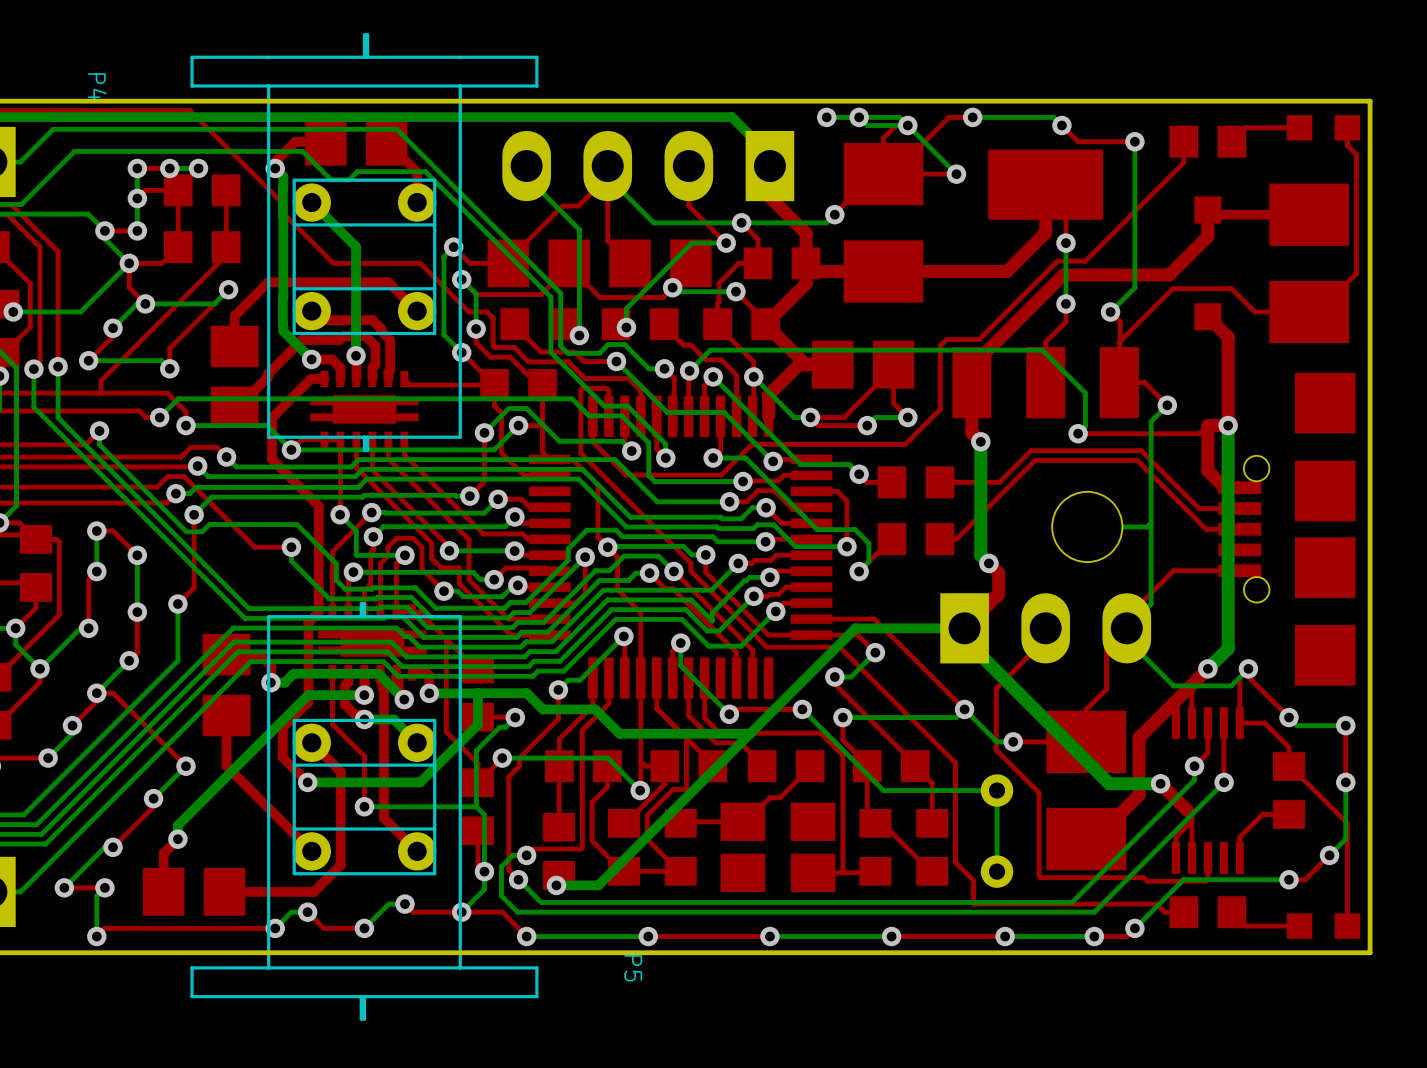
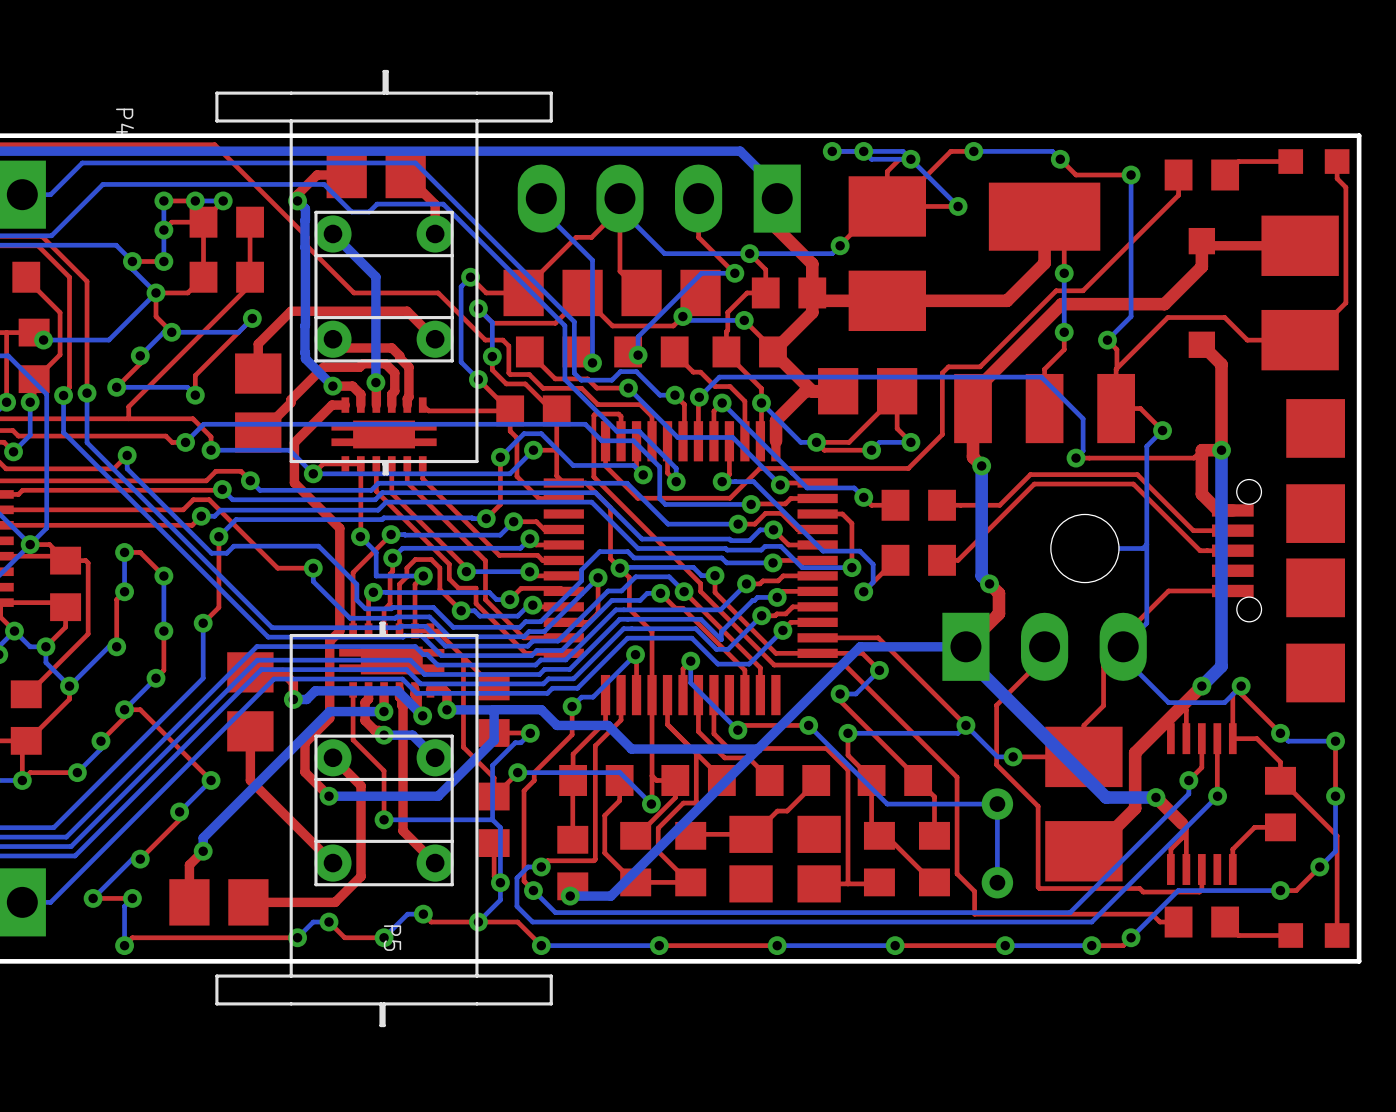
P5 name position: P5 (633, 968) -> P5 (392, 938)

